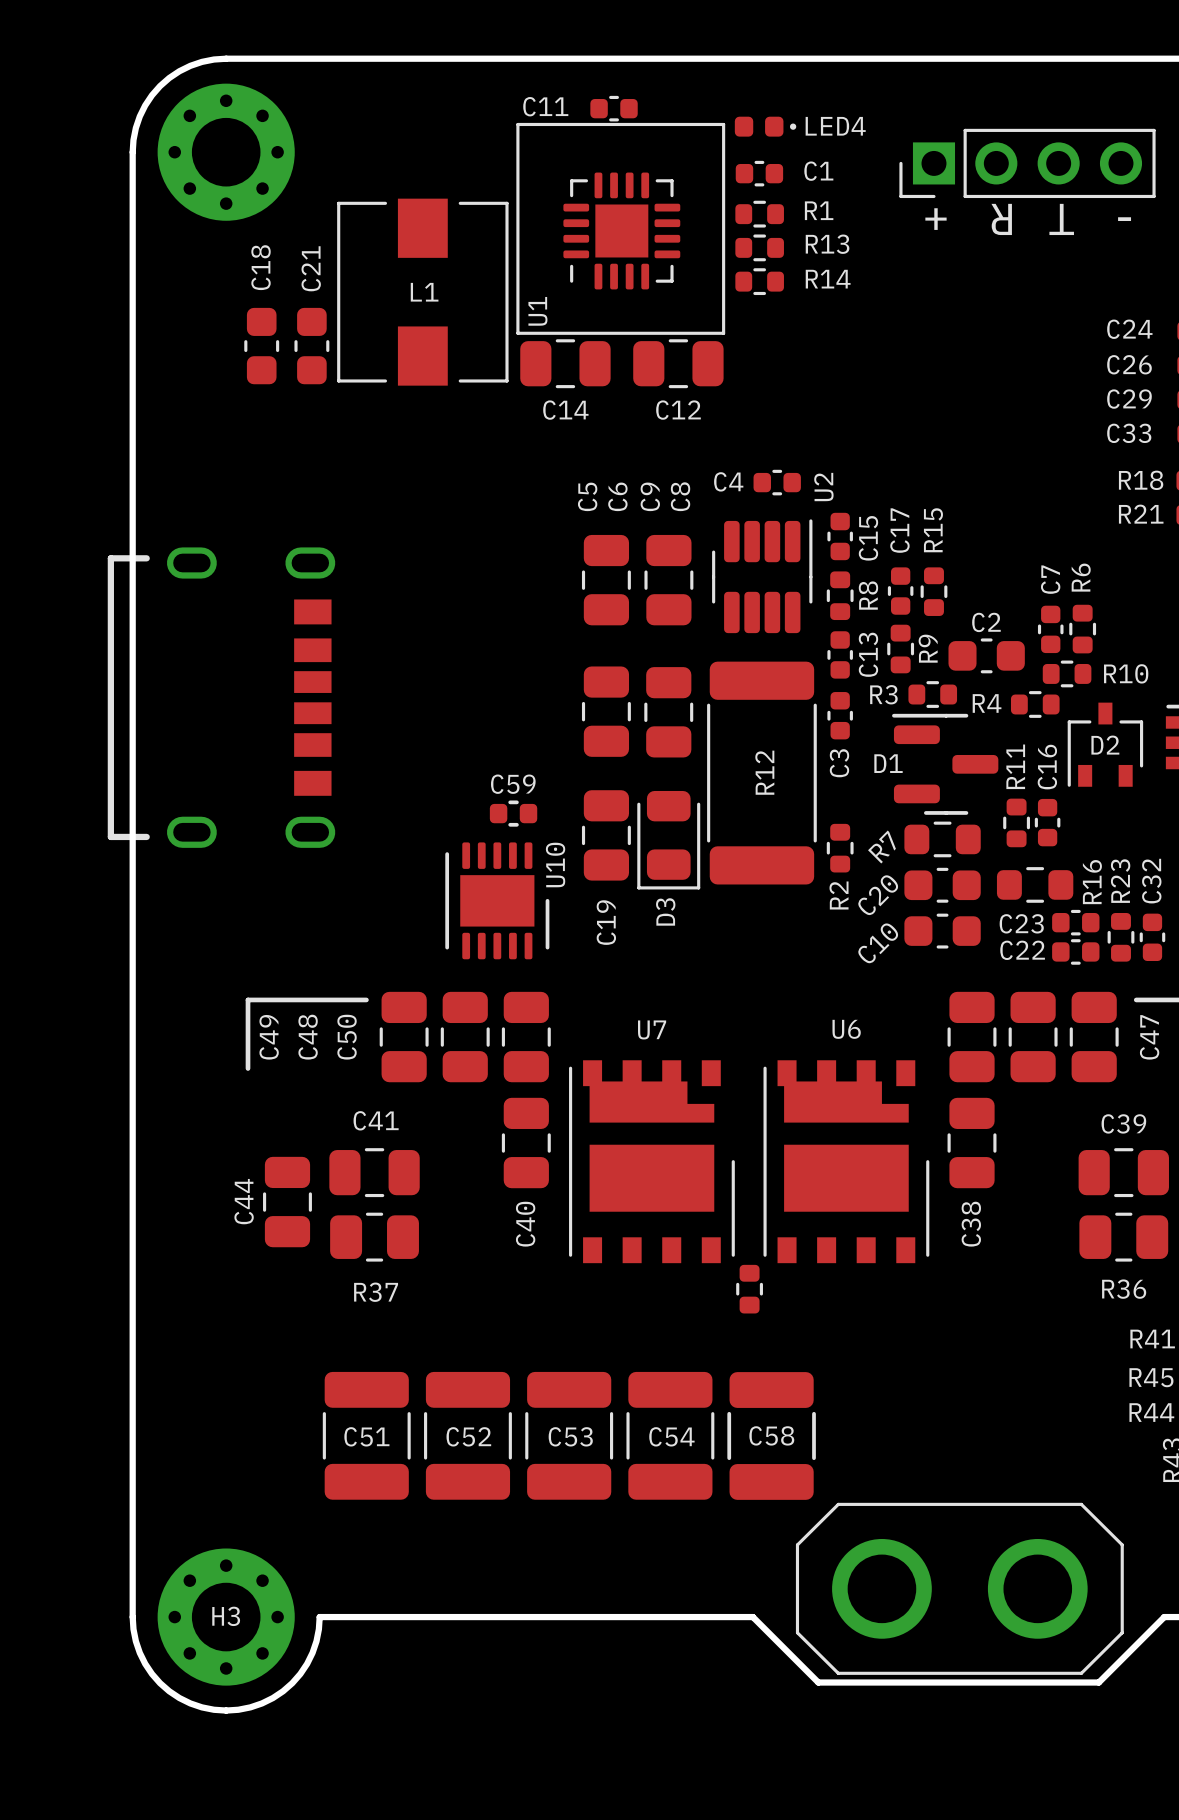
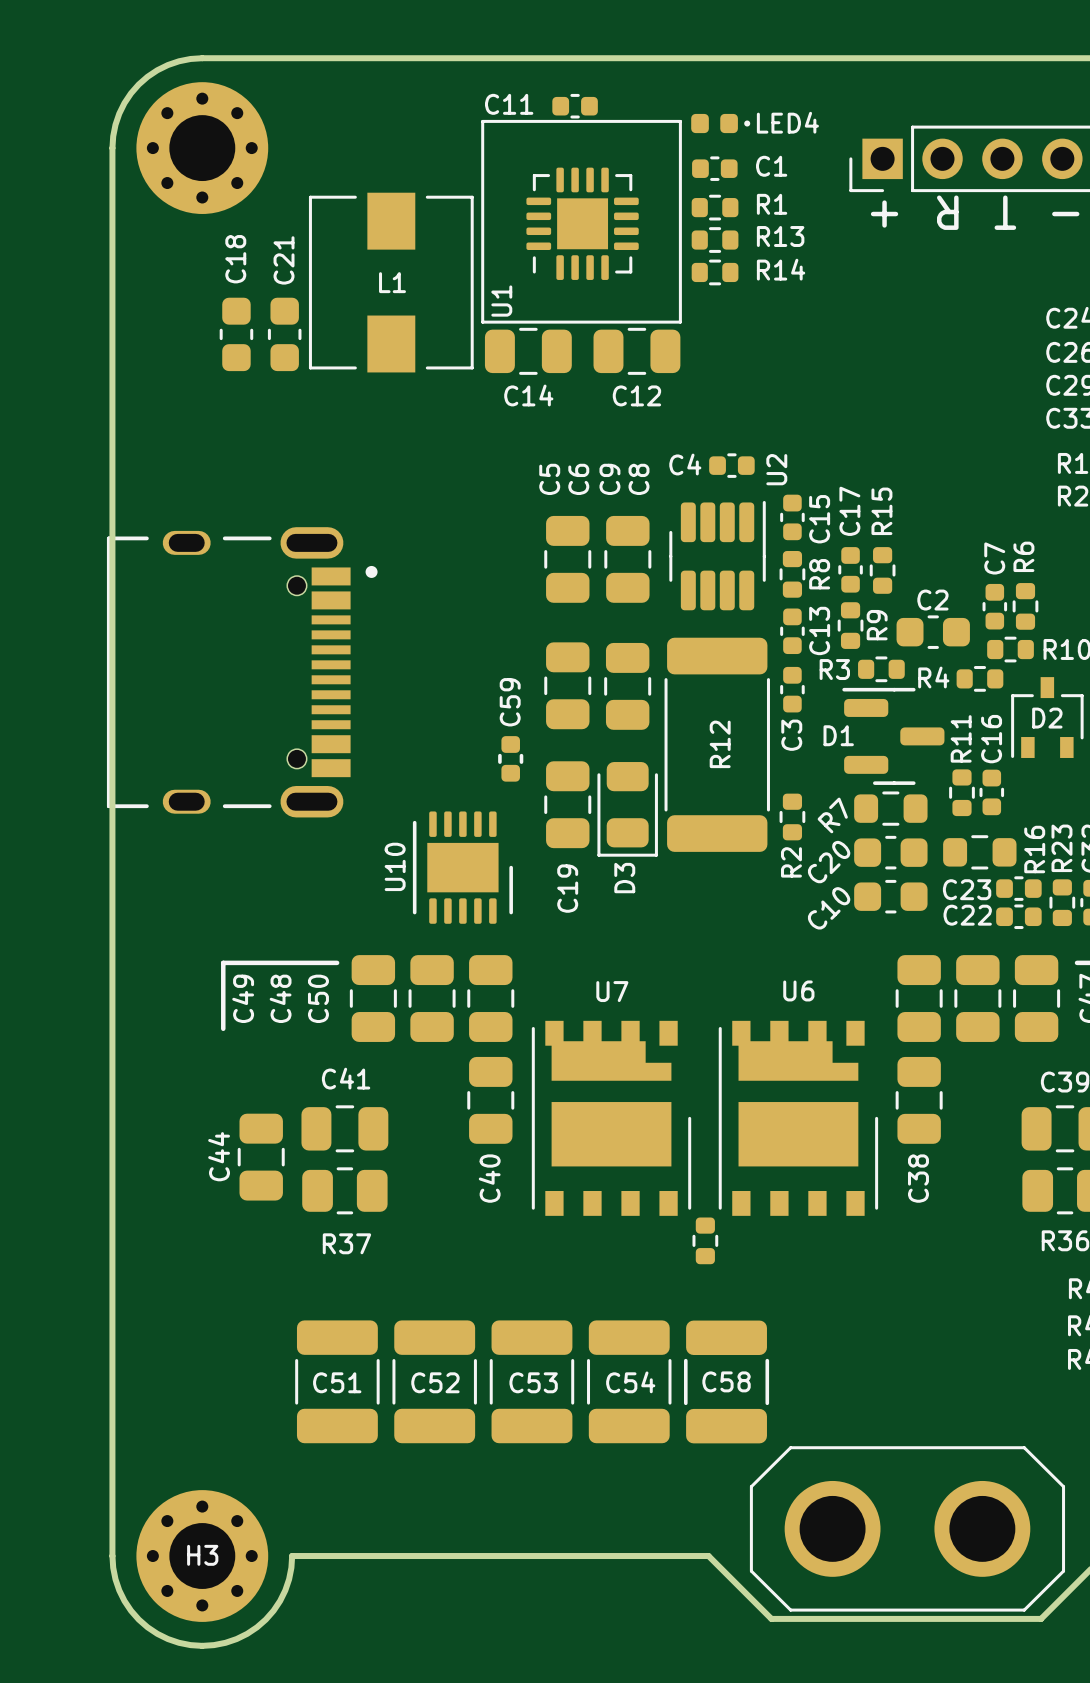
part: (221, 697) -> none
part: none -> (242, 672)
C59 rotation: 0° (513, 813) -> 90° clockwise (510, 758)
C59 position: (513, 813) -> (510, 758)
U10 name position: U10 (555, 864) -> U10 (395, 866)

